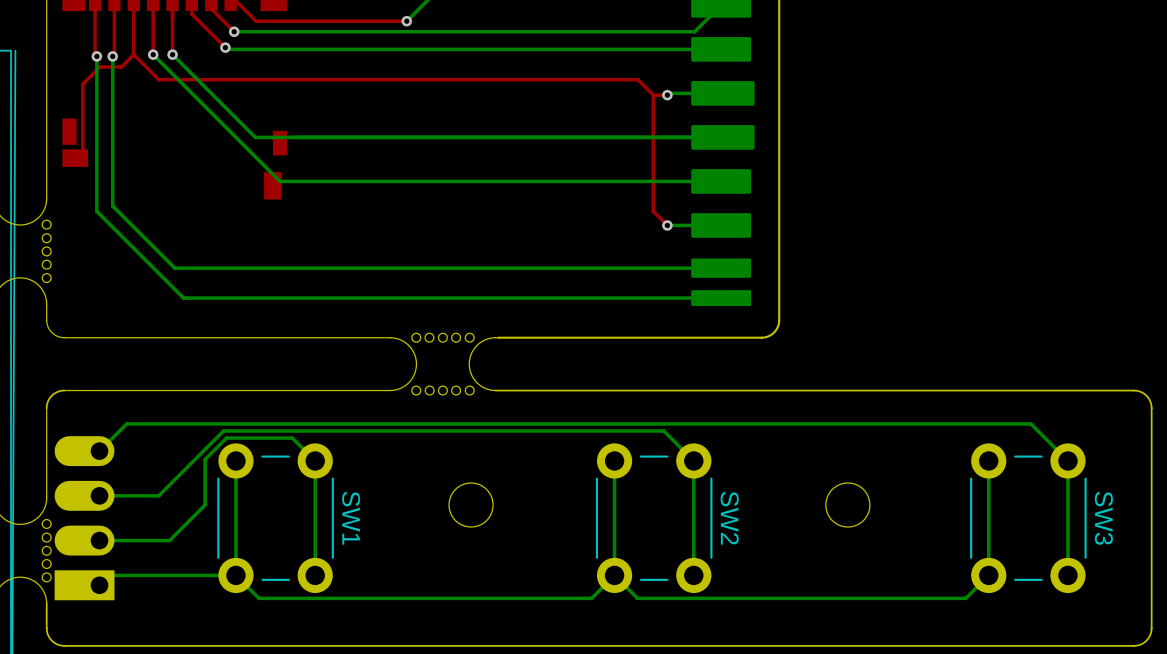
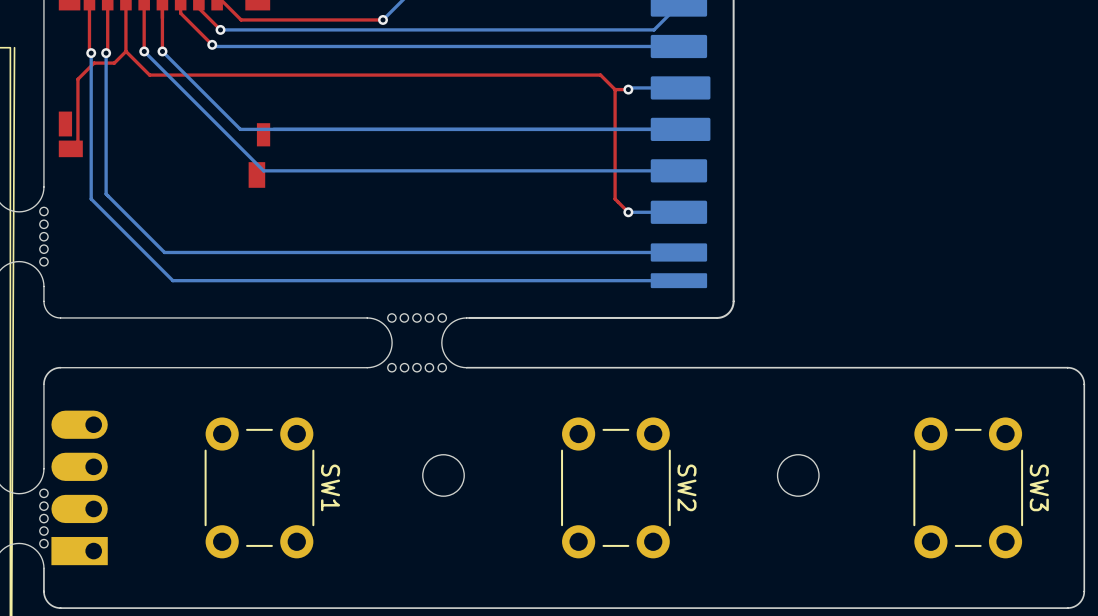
bottom track: (99, 451) (126, 423) (1030, 423) (1067, 460) (1067, 575) -> none
bottom track: (235, 460) (235, 575) -> none
bottom track: (614, 460) (614, 575) -> none
bottom track: (988, 460) (988, 575) (965, 598) (637, 598) (614, 575) -> none
bottom track: (99, 495) (158, 495) (223, 431) (663, 431) (693, 460) (693, 575) -> none
bottom track: (99, 540) (169, 540) (205, 504) (205, 459) (226, 438) (292, 438) (315, 460) (315, 575) -> none
bottom track: (235, 575) (109, 575) (99, 585) -> none
bottom track: (614, 575) (591, 598) (258, 598) (235, 575) -> none

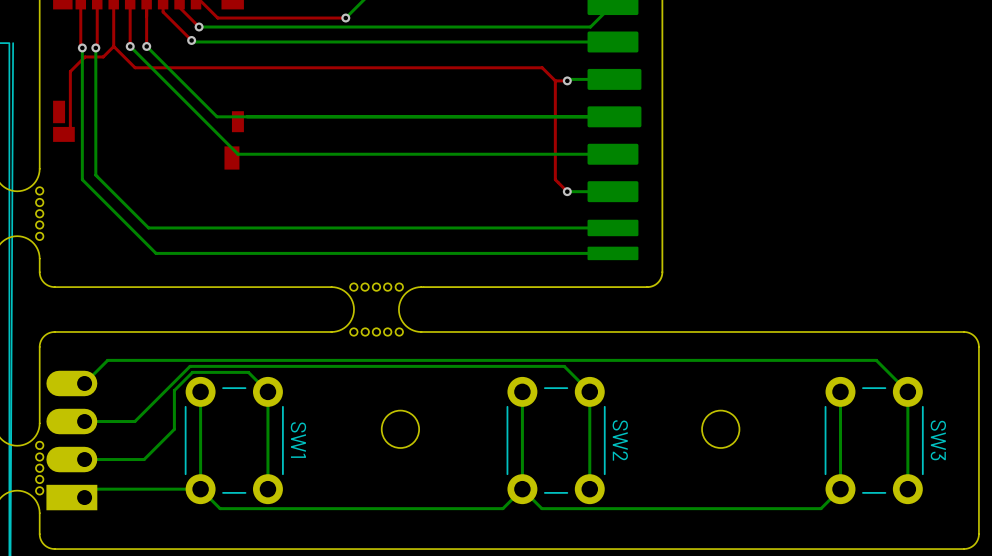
bottom track: none -> (84, 383) (107, 360) (876, 360) (907, 391) (907, 489)
bottom track: none -> (200, 391) (200, 489)
bottom track: none -> (522, 391) (522, 489)
bottom track: none -> (840, 391) (840, 489) (821, 508) (541, 508) (522, 489)
bottom track: none -> (84, 421) (134, 421) (190, 366) (564, 366) (589, 391) (589, 489)
bottom track: none -> (84, 459) (144, 459) (174, 429) (174, 390) (192, 372) (248, 372) (267, 391) (267, 489)
bottom track: none -> (200, 489) (92, 489) (84, 497)
bottom track: none -> (522, 489) (502, 508) (220, 508) (200, 489)

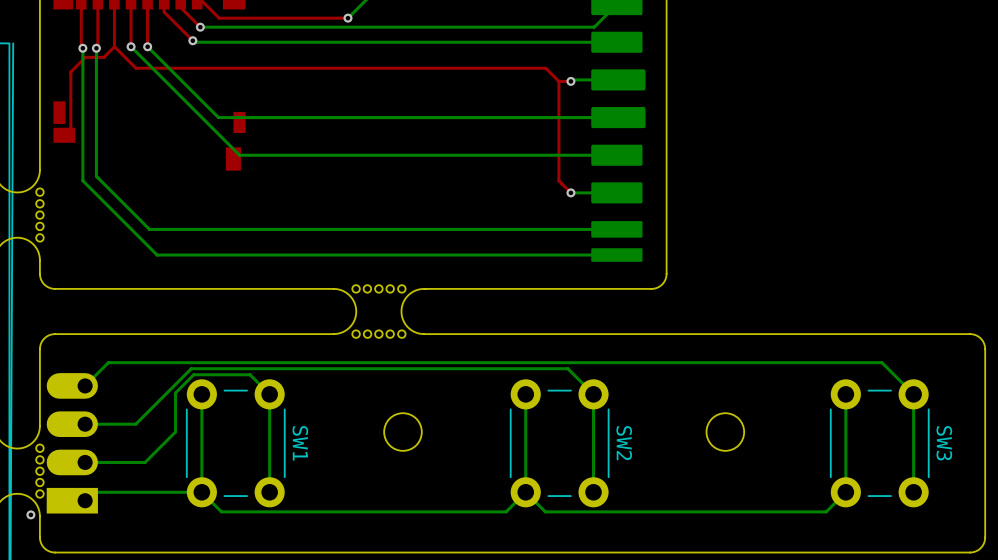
via: none -> (30, 514)

